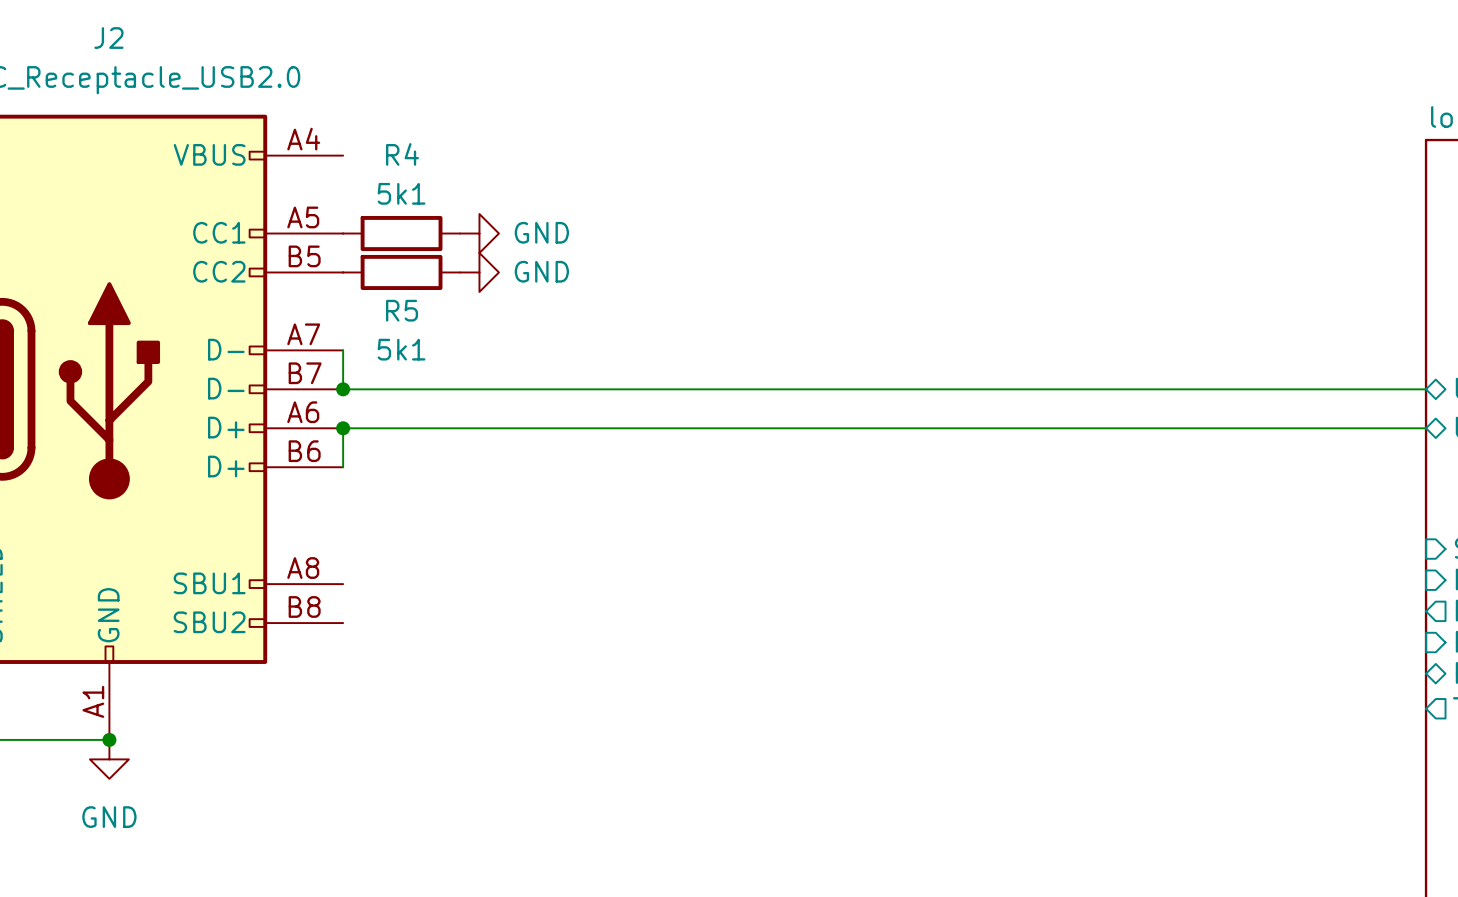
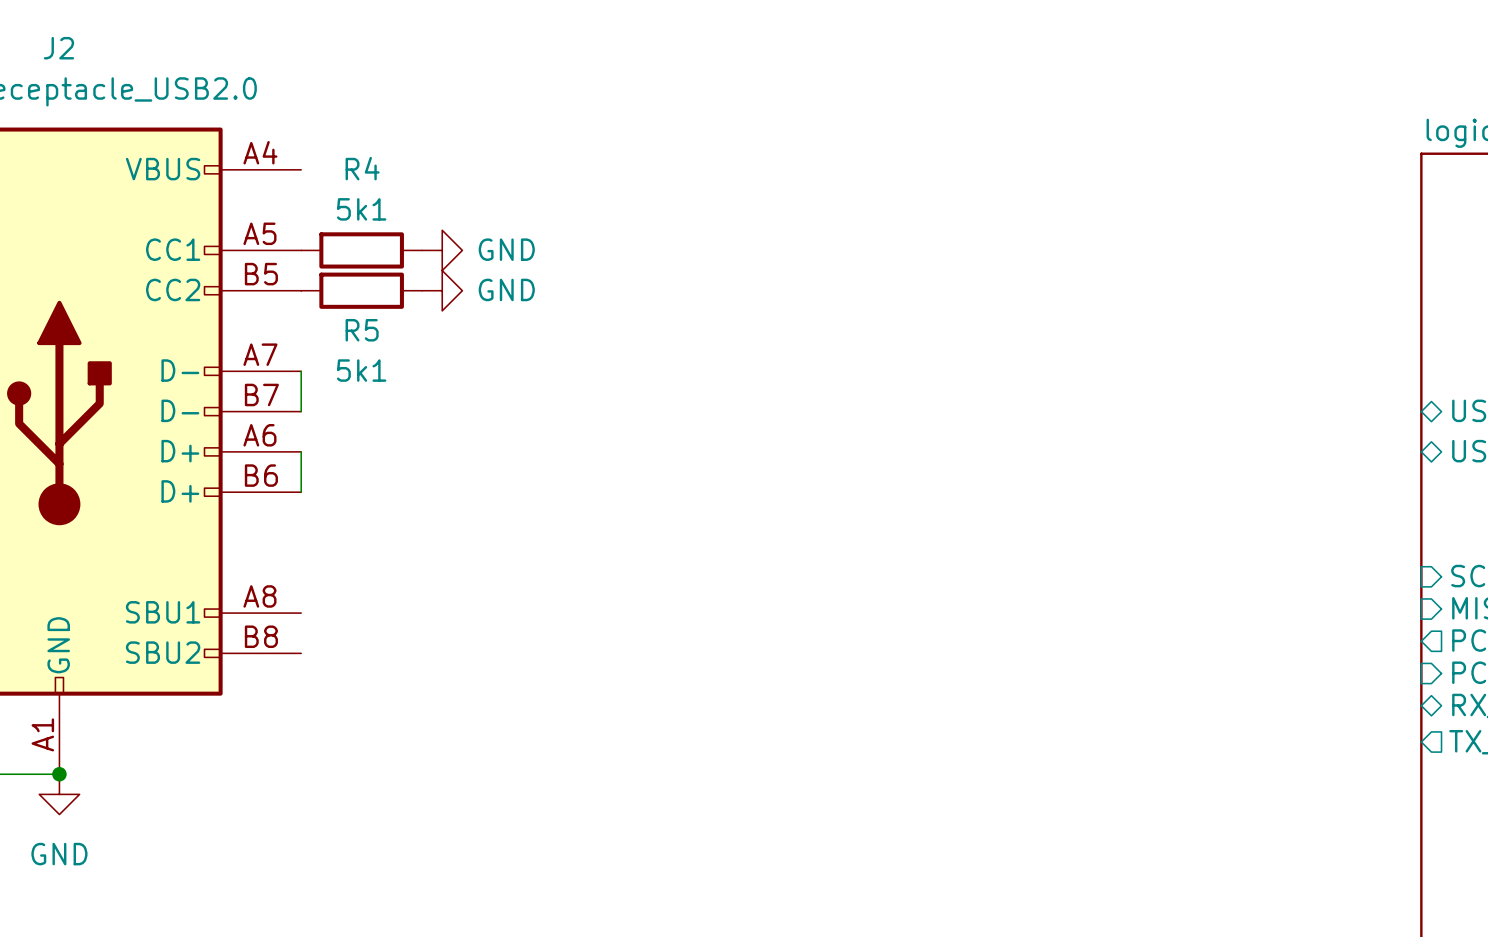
wire: (343, 389) (1426, 389) -> none
junction: (343, 389) -> none
wire: (343, 428) (1426, 428) -> none
junction: (343, 428) -> none

